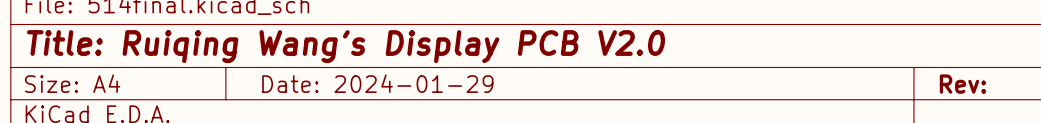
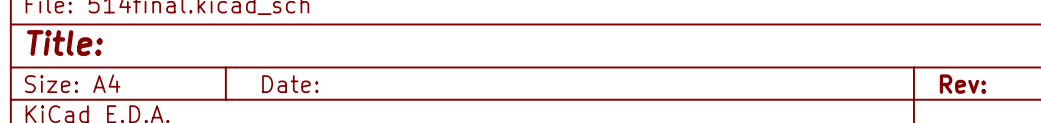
title block: Title: Ruiqing Wang's Display PCB V2.0 (346, 46) -> Title: (64, 43)
title block: Date: 2024-01-29 (377, 83) -> Date: (290, 84)

